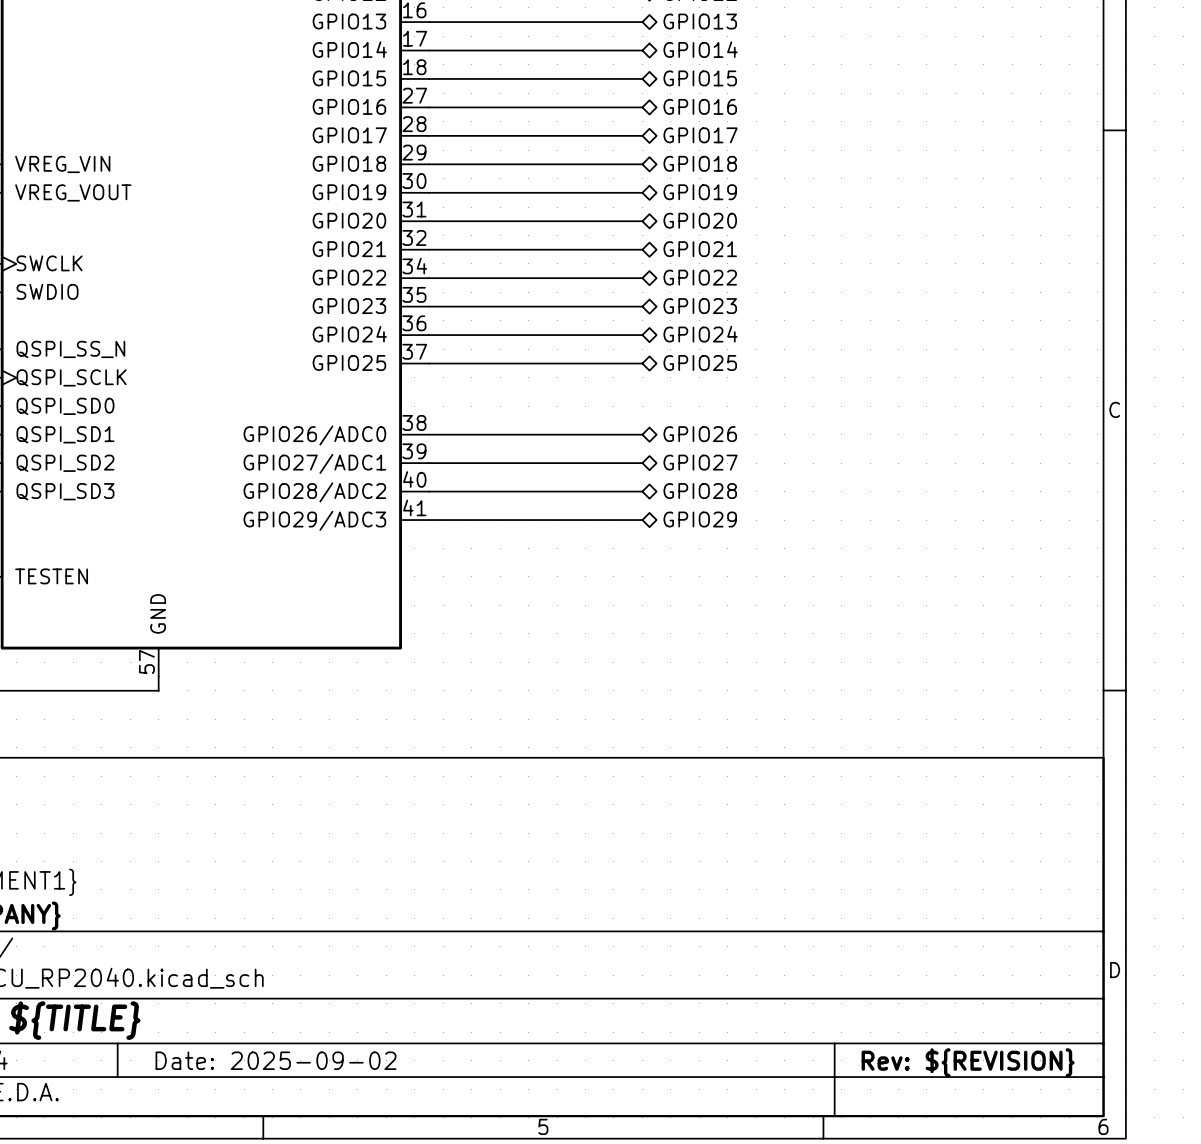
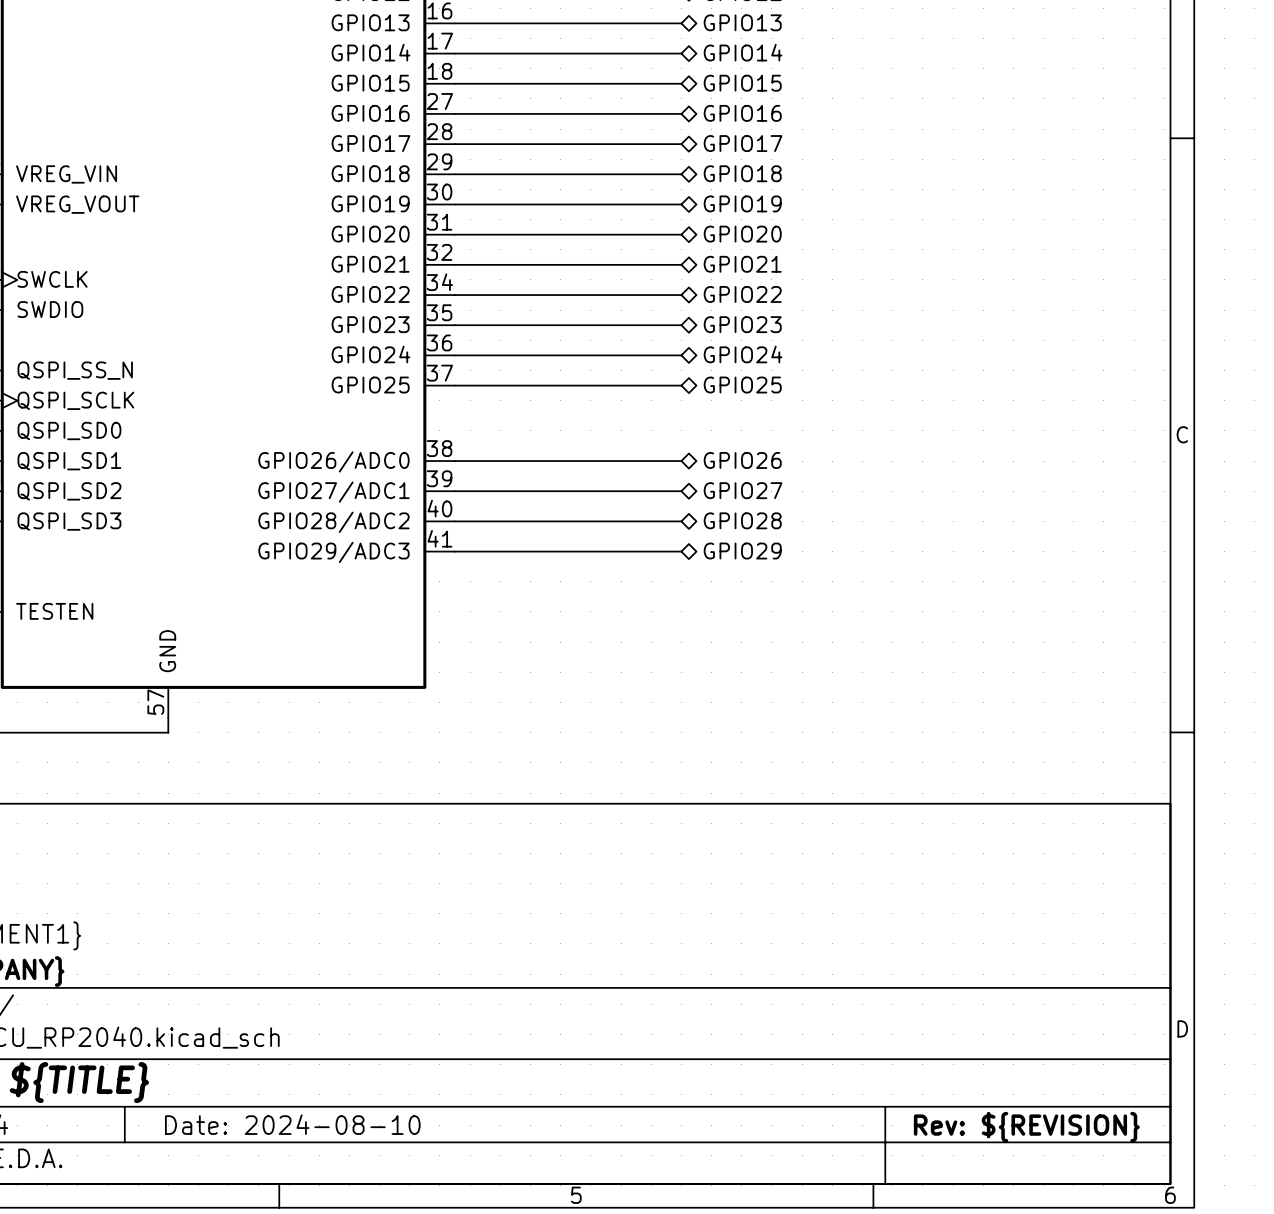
title block: Date: 2025-09-02 (276, 1060) -> Date: 2024-08-10 (292, 1124)

